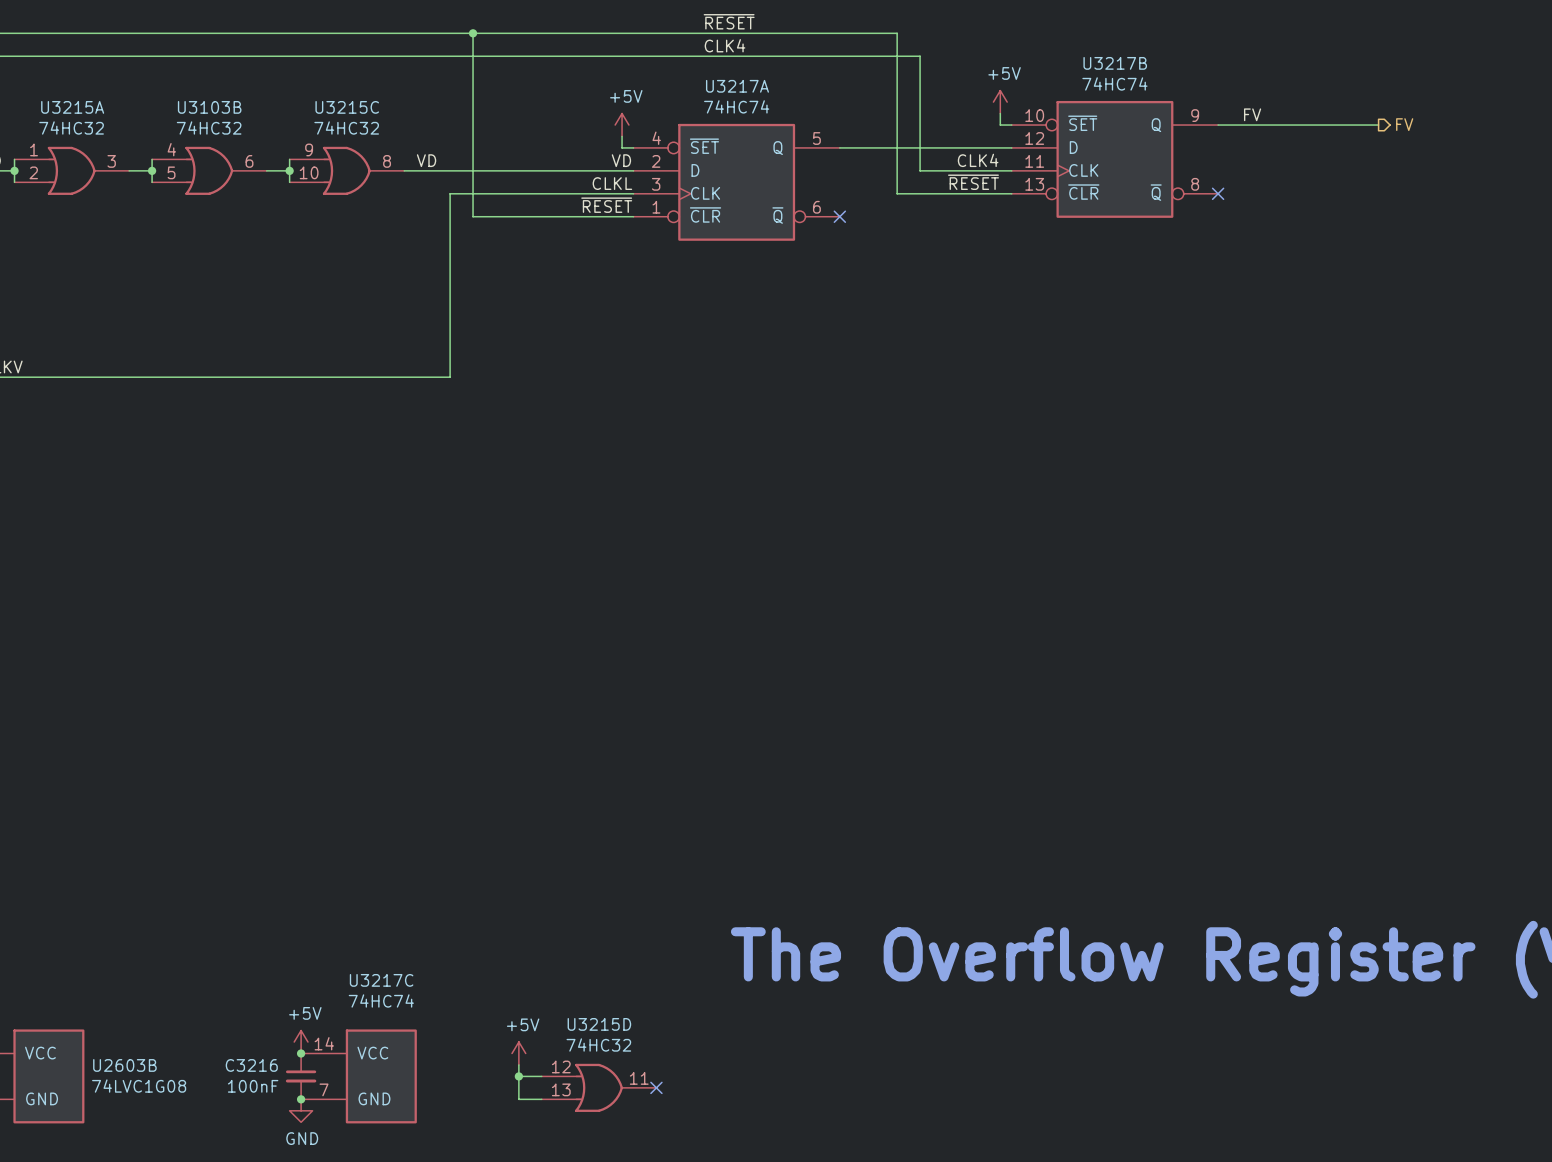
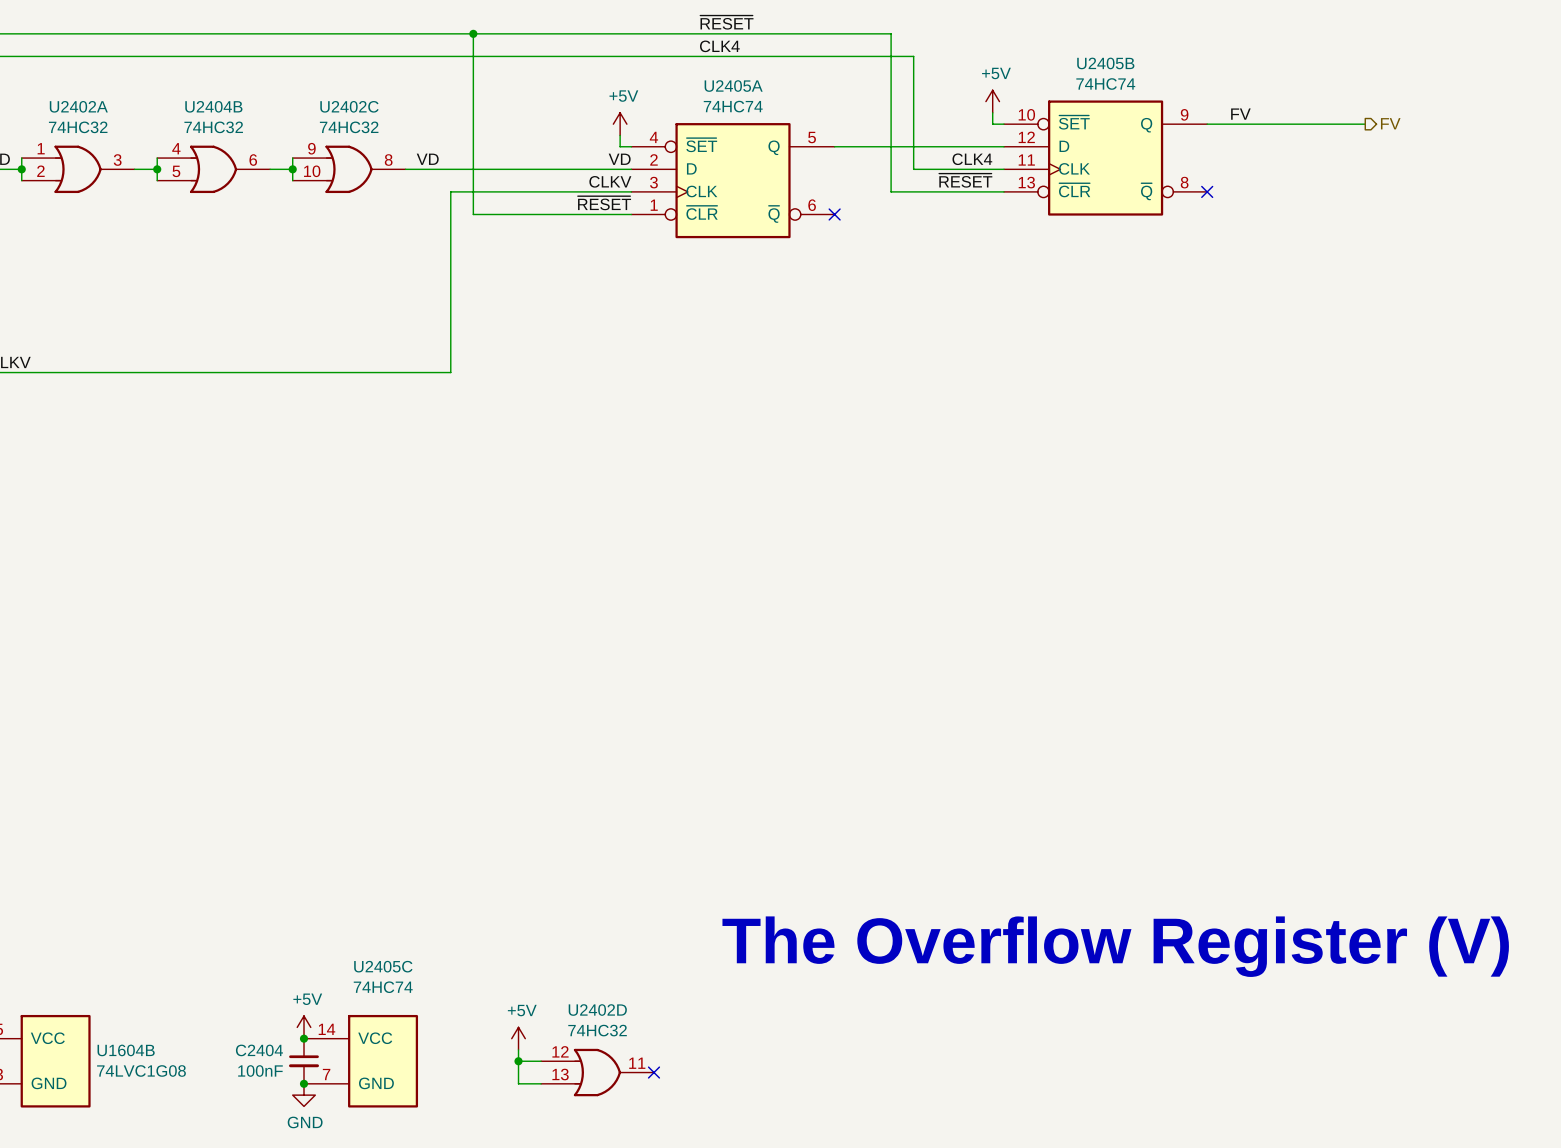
U3217B name: U3217B (1115, 63) -> U2405B (1105, 63)
U3217A name: U3217A (737, 86) -> U2405A (733, 86)
U3215A name: U3215A (72, 107) -> U2402A (78, 106)
U3103B name: U3103B (209, 107) -> U2404B (213, 106)
U3215C name: U3215C (347, 107) -> U2402C (349, 106)
label: CLKL (612, 183) -> CLKV (610, 181)
U3217C name: U3217C (381, 980) -> U2405C (383, 966)
U3215D name: U3215D (599, 1024) -> U2402D (597, 1010)
U2603B name: U2603B (124, 1065) -> U1604B (126, 1050)
C3216 name: C3216 (251, 1065) -> C2404 (259, 1050)

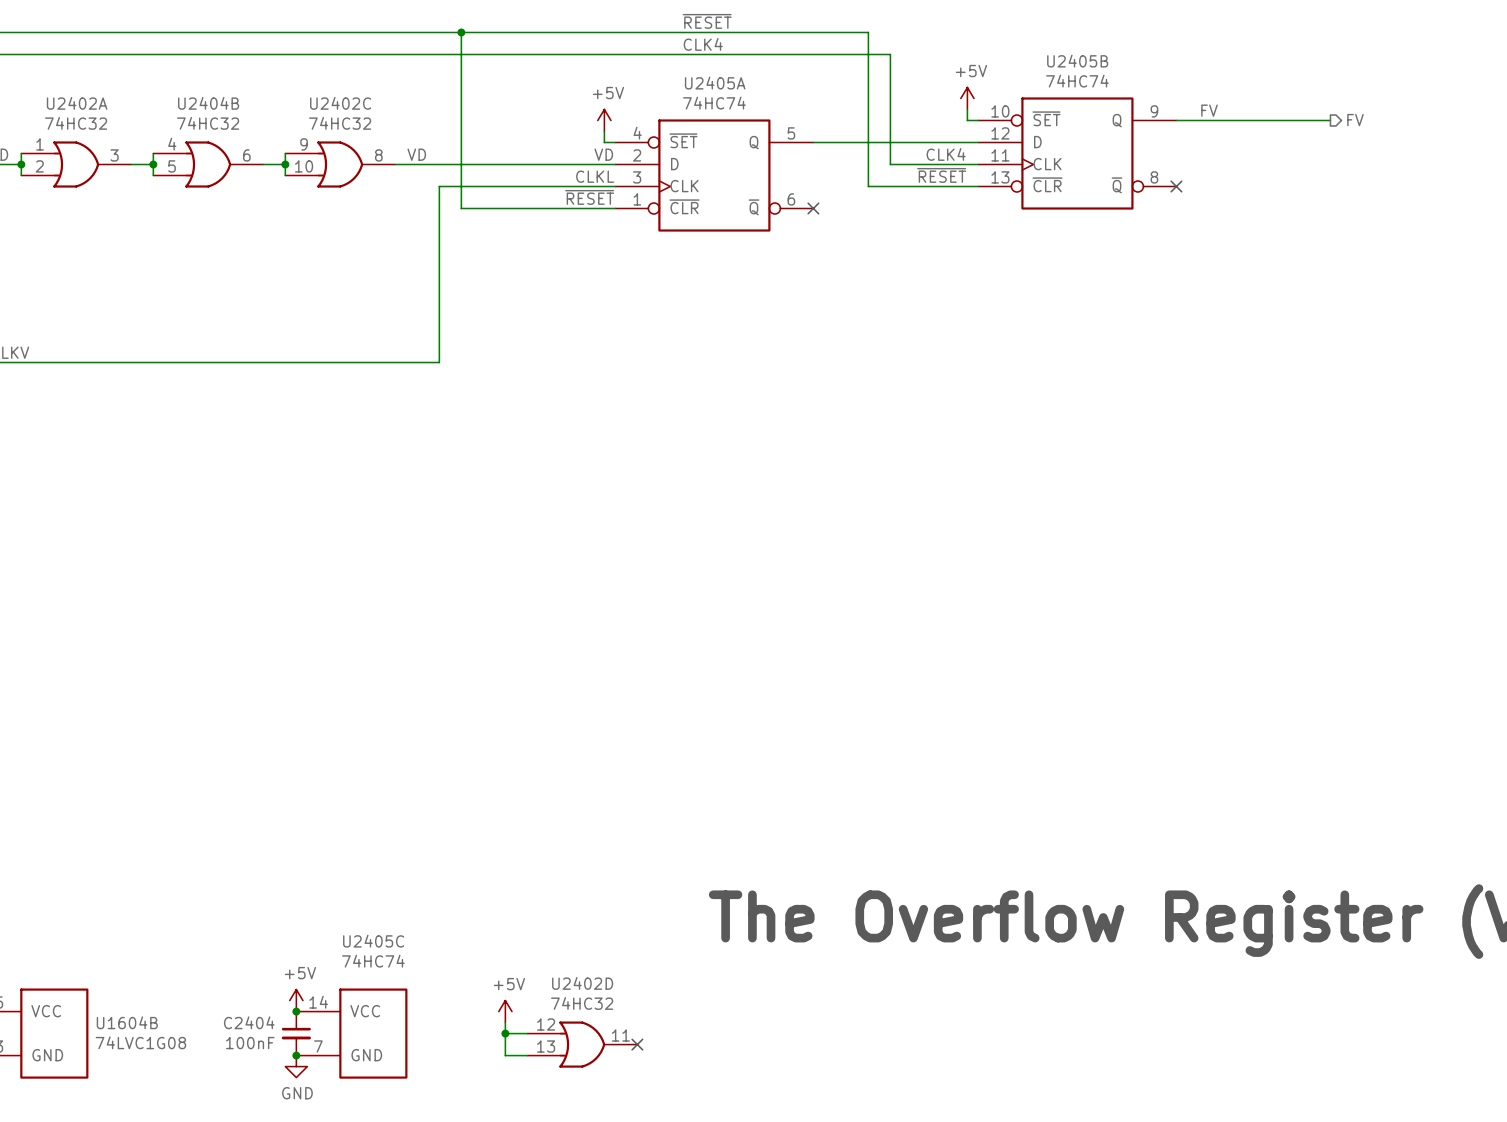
label: CLKV (610, 181) -> CLKL (595, 176)

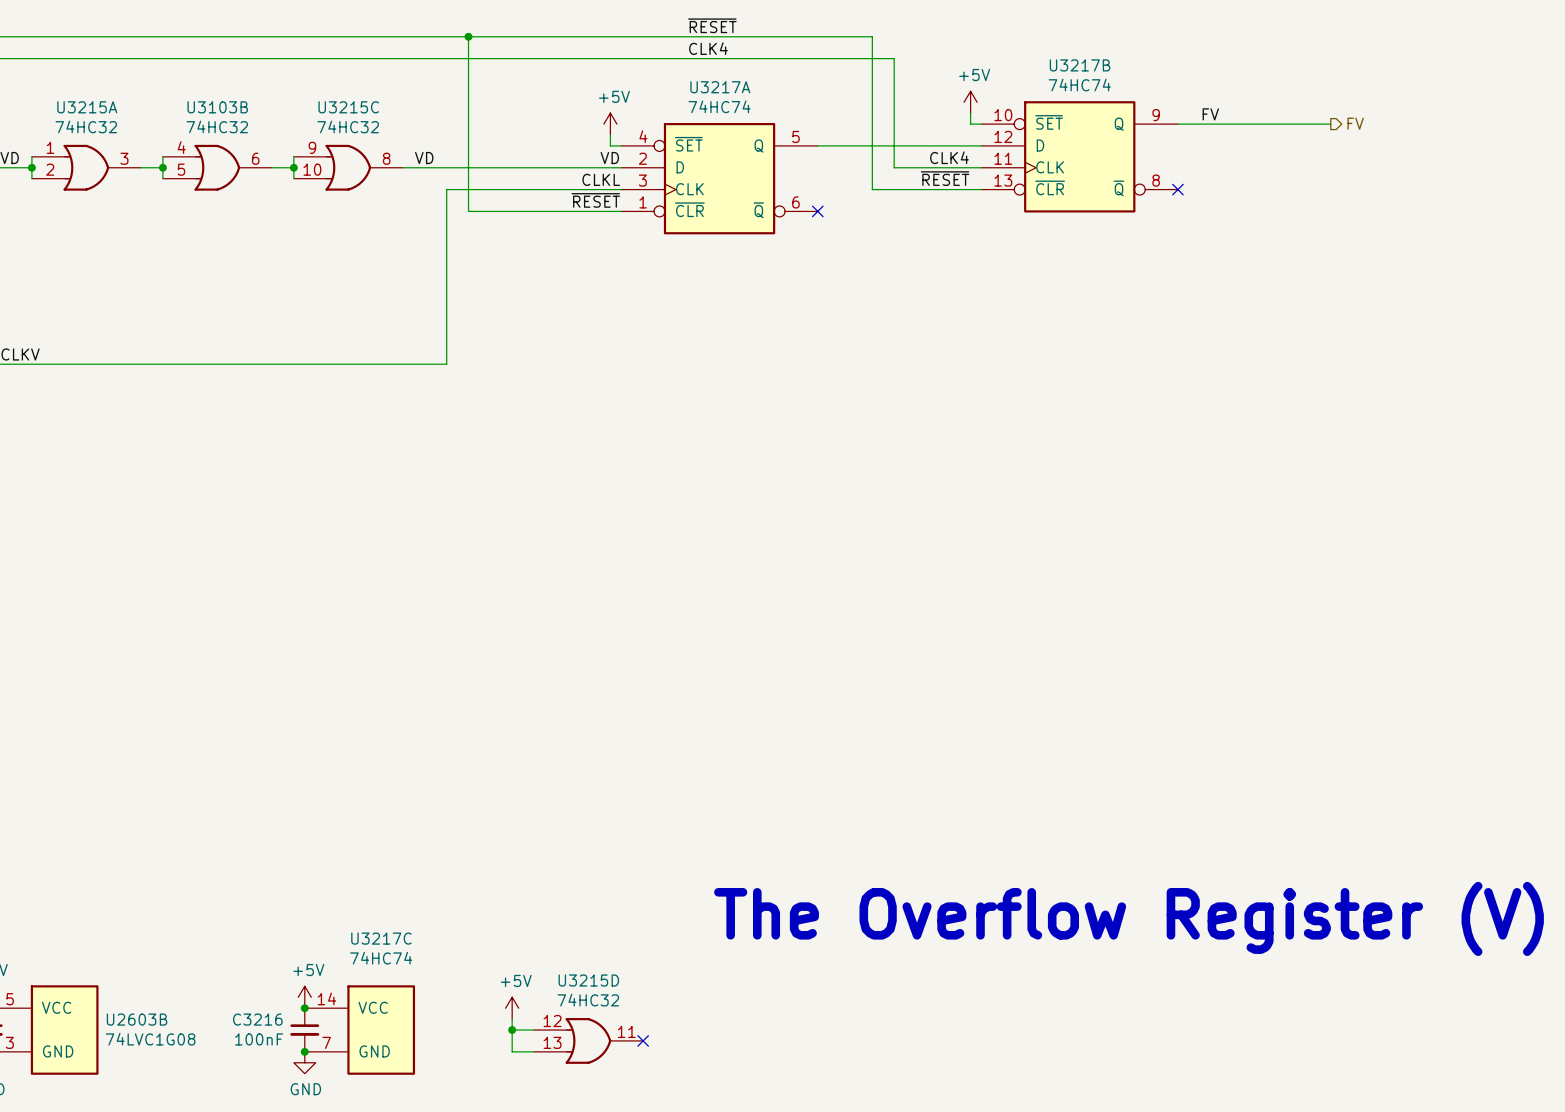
U2405B name: U2405B (1077, 61) -> U3217B (1080, 65)
U2405A name: U2405A (715, 83) -> U3217A (720, 87)
U2402A name: U2402A (77, 103) -> U3215A (87, 107)
U2404B name: U2404B (208, 103) -> U3103B (217, 107)
U2402C name: U2402C (340, 103) -> U3215C (348, 107)
U2405C name: U2405C (373, 941) -> U3217C (381, 938)
U2402D name: U2402D (582, 983) -> U3215D (588, 980)
U1604B name: U1604B (127, 1022) -> U2603B (137, 1019)
C2404 name: C2404 (249, 1022) -> C3216 (257, 1019)

